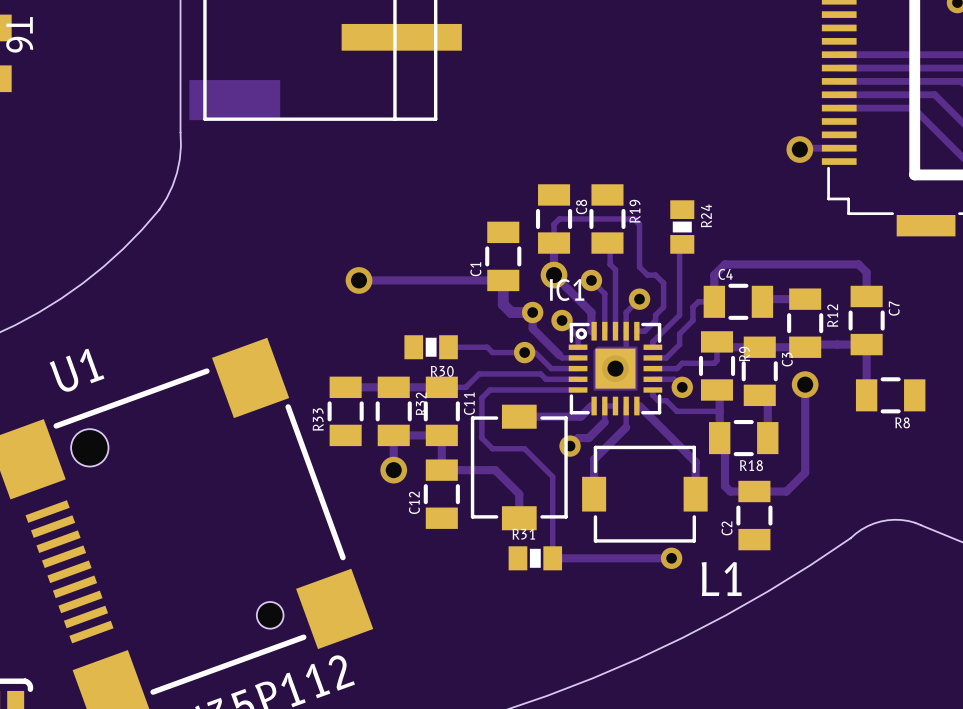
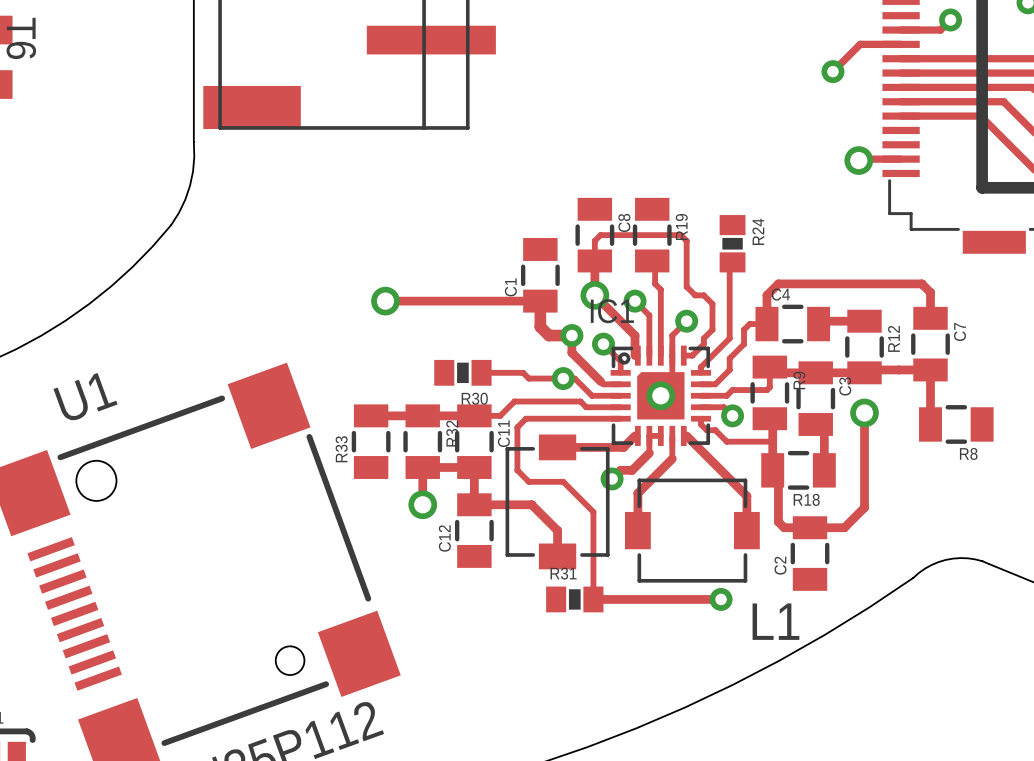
track: none -> (950, 19) (940, 30) (901, 30)
via: none -> (950, 19)
track: none -> (901, 44) (860, 44) (832, 71)
via: none -> (832, 71)

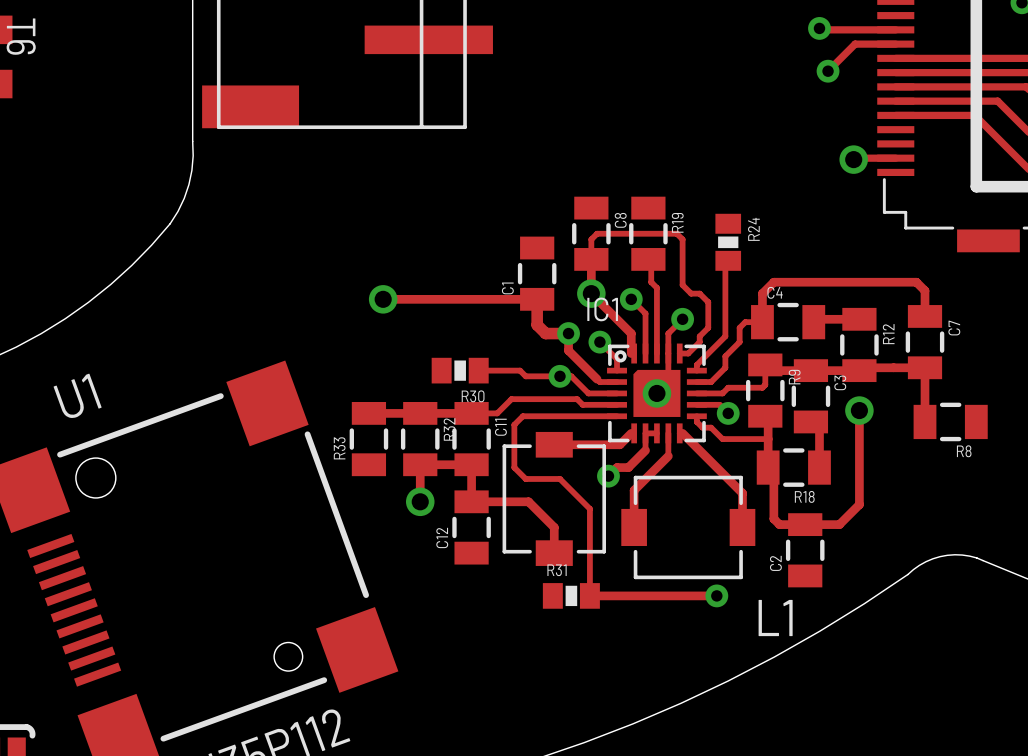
track: (950, 19) (940, 30) (901, 30) -> (819, 28) (895, 29)
via: (950, 19) -> none
via: none -> (819, 28)

